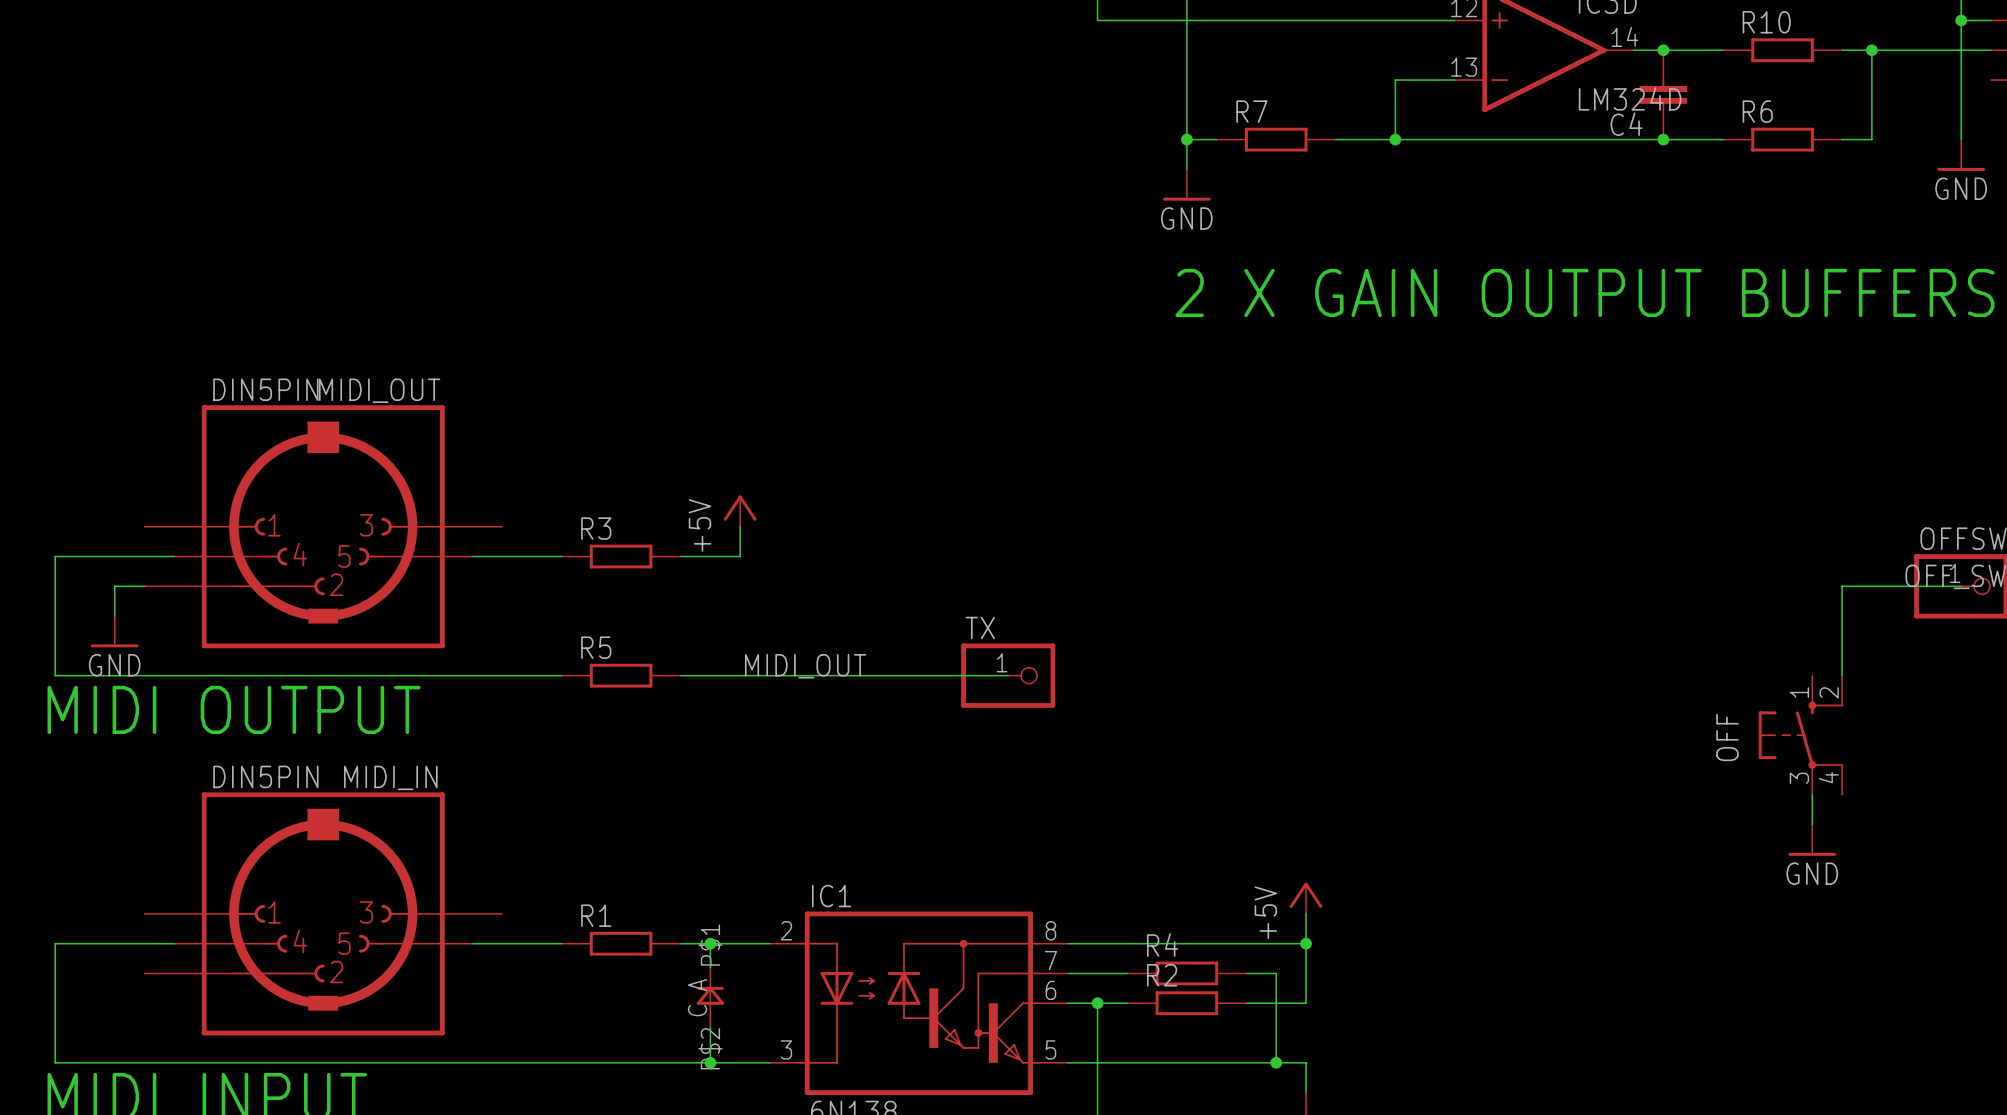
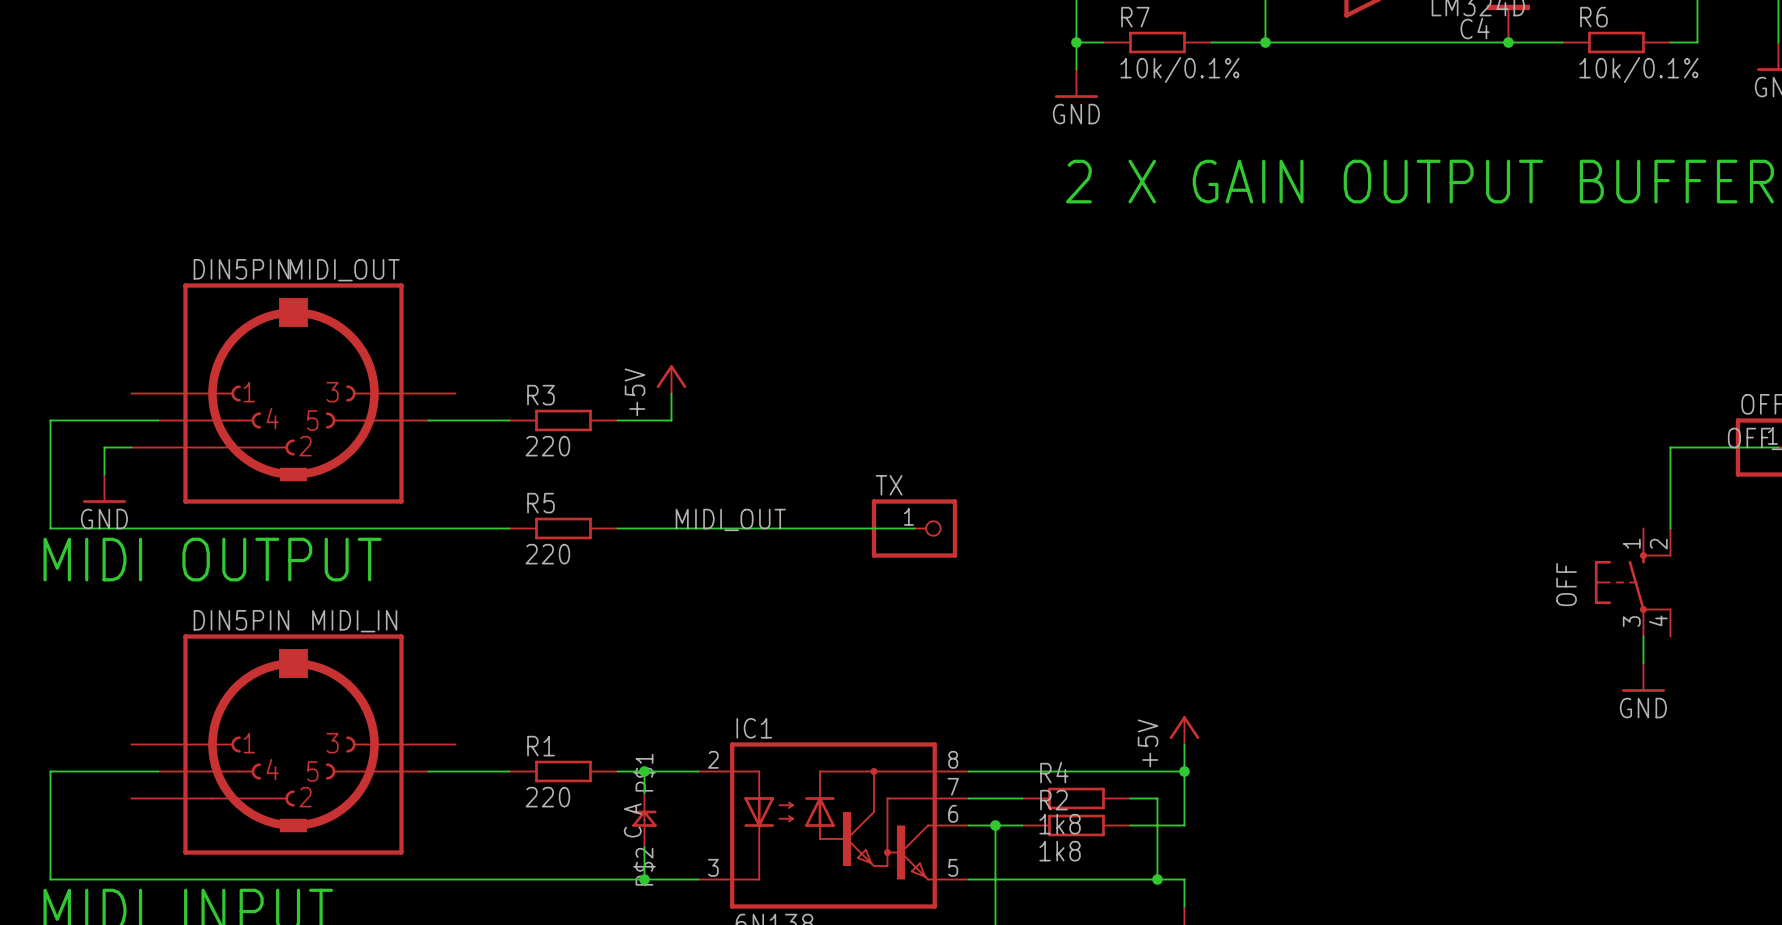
R7 value: none -> 10k/0.1% (1179, 69)
R6 value: none -> 10k/0.1% (1638, 69)
R3 value: none -> 220 (547, 446)
R5 value: none -> 220 (547, 554)
R1 value: none -> 220 (547, 797)
R4 value: none -> 1k8 (1060, 824)
R2 value: none -> 1k8 (1060, 851)

